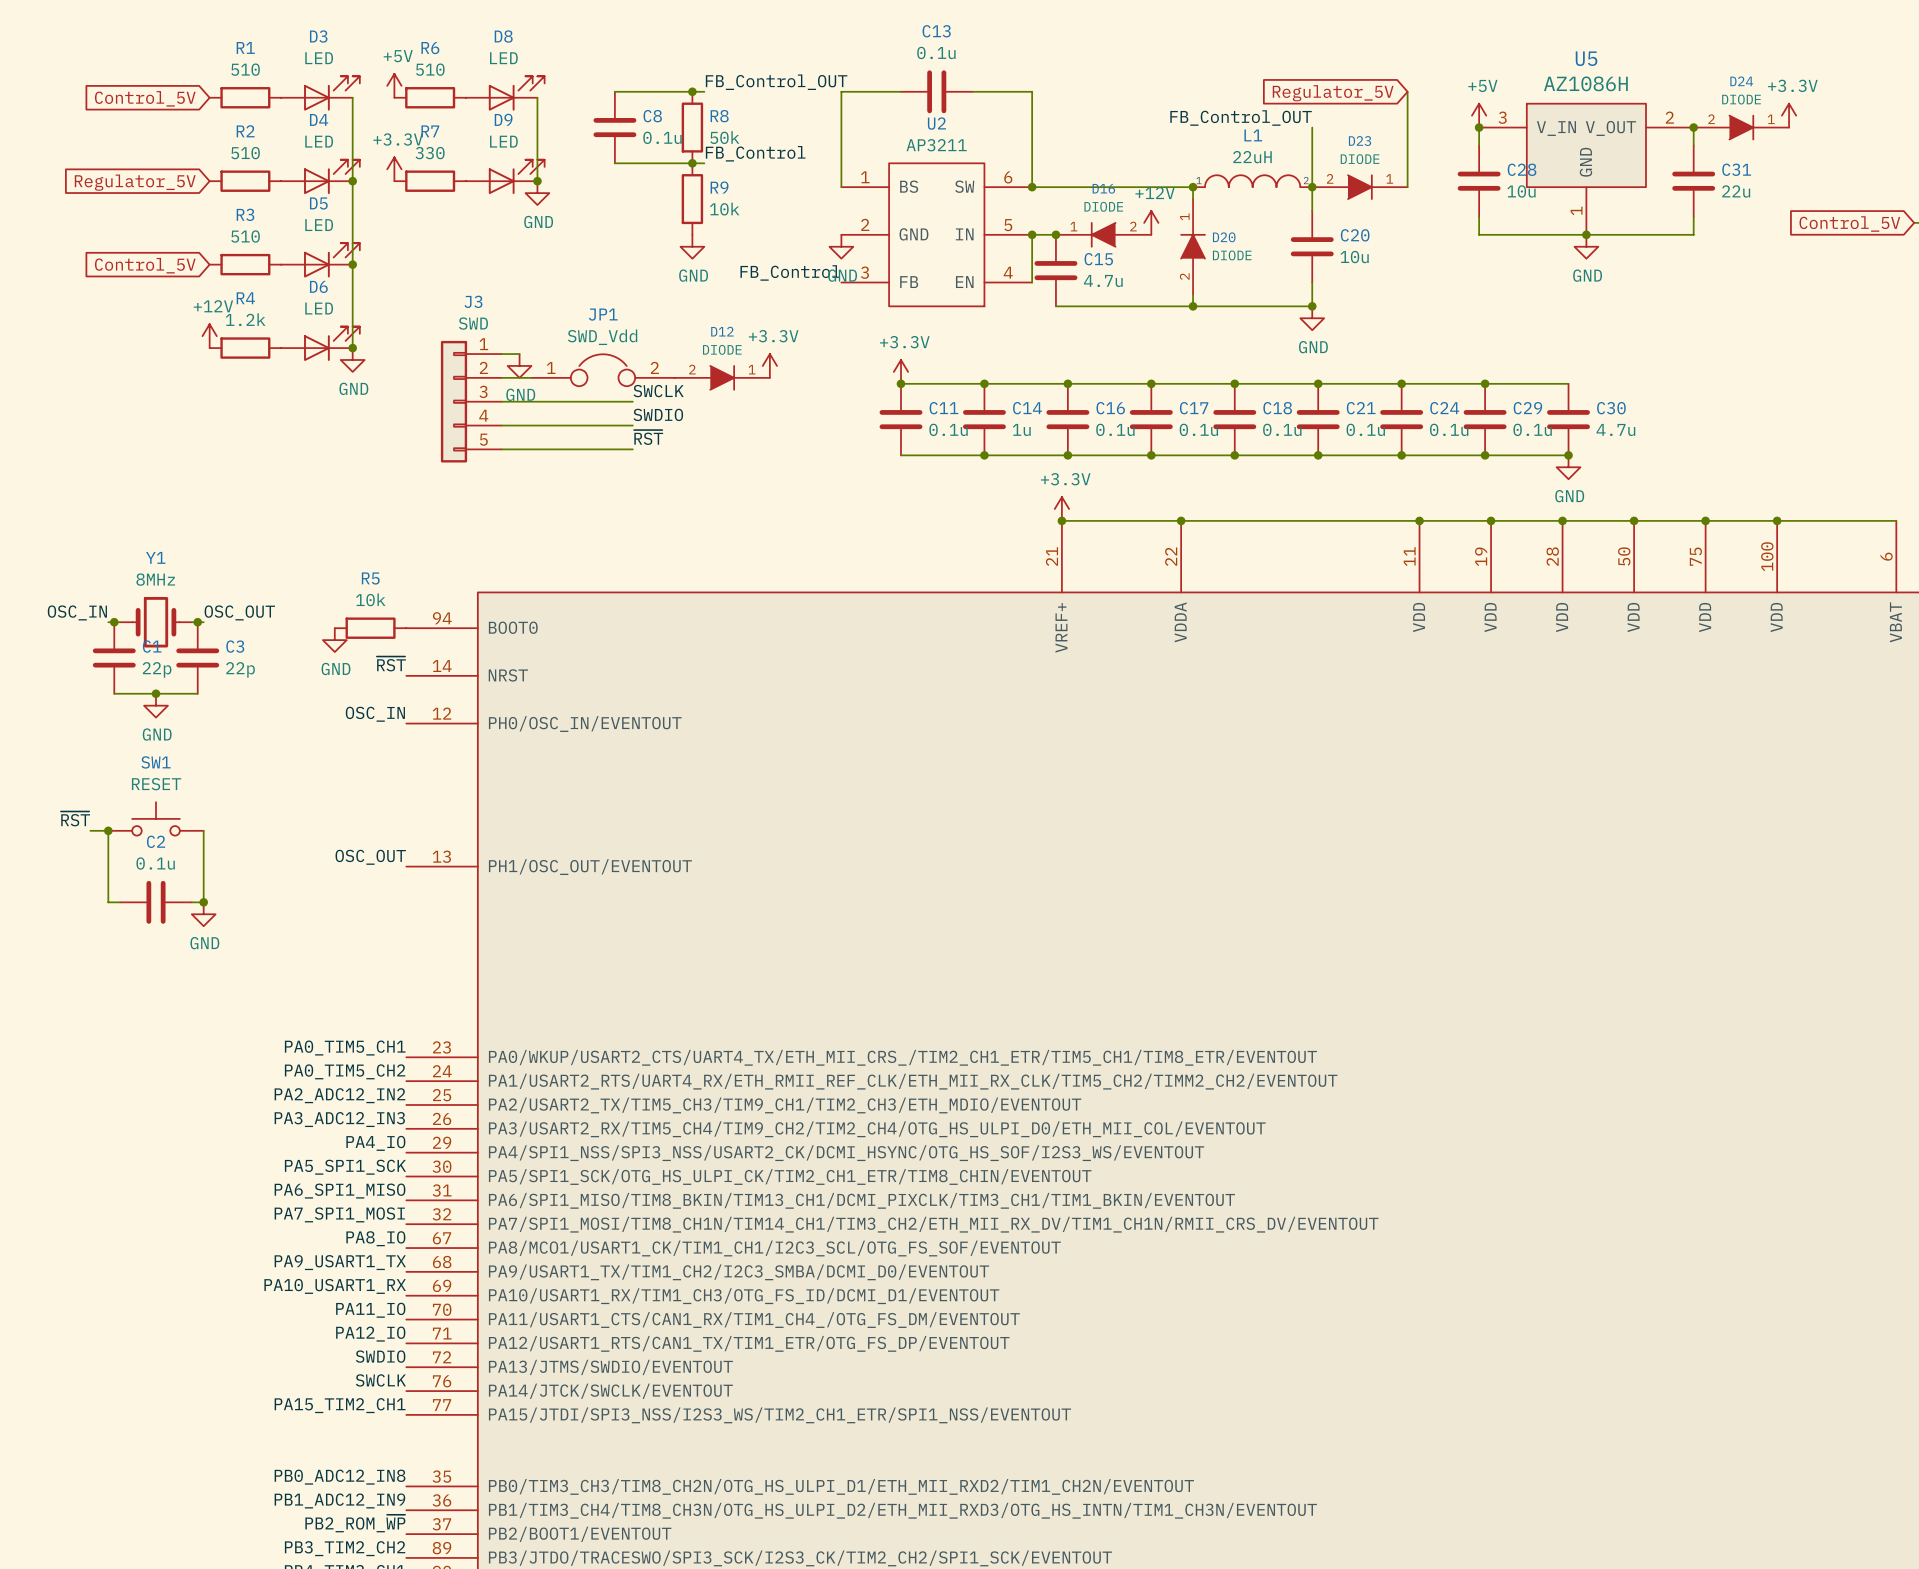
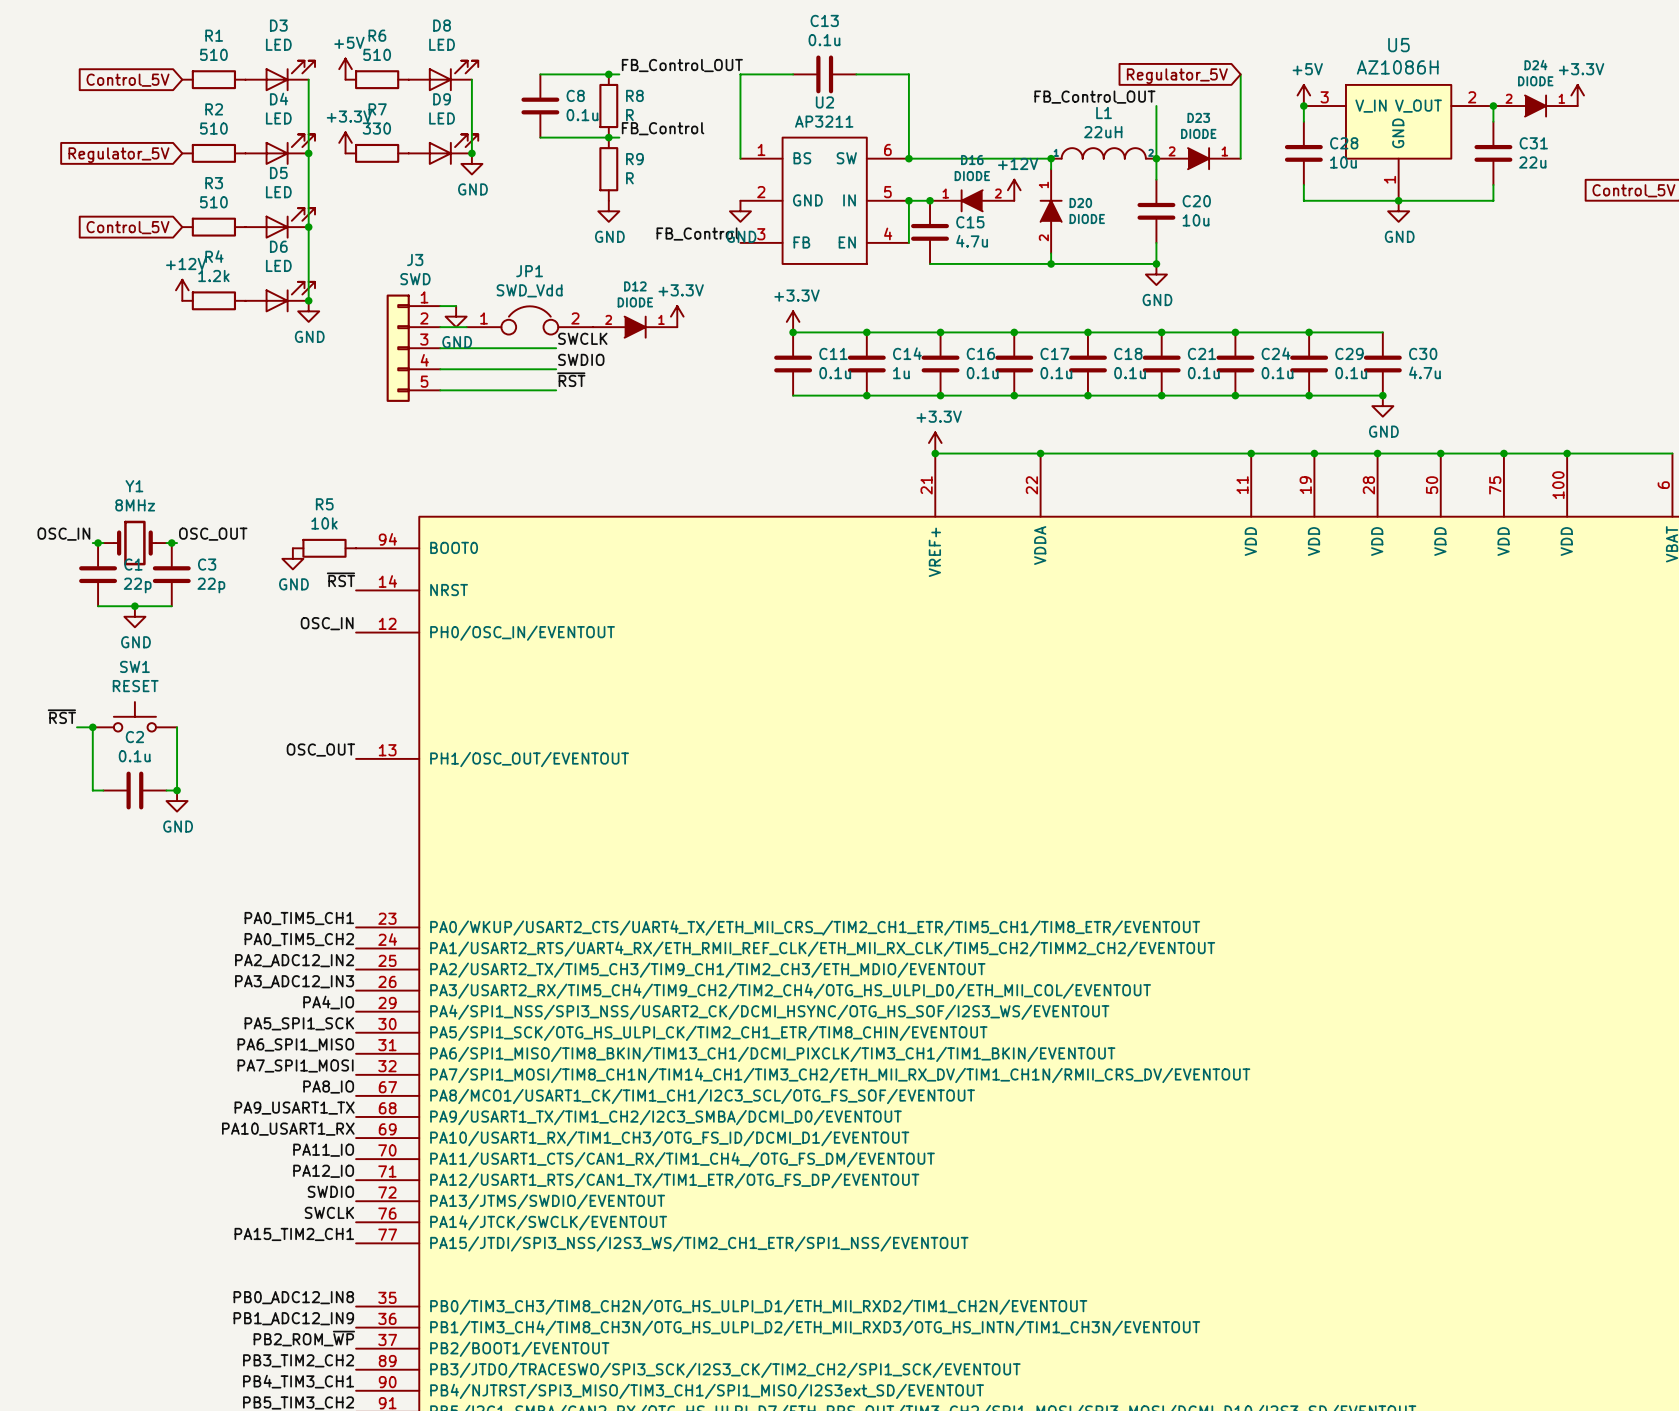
R8 value: 50k (724, 137) -> R (629, 115)
R9 value: 10k (724, 209) -> R (629, 178)

